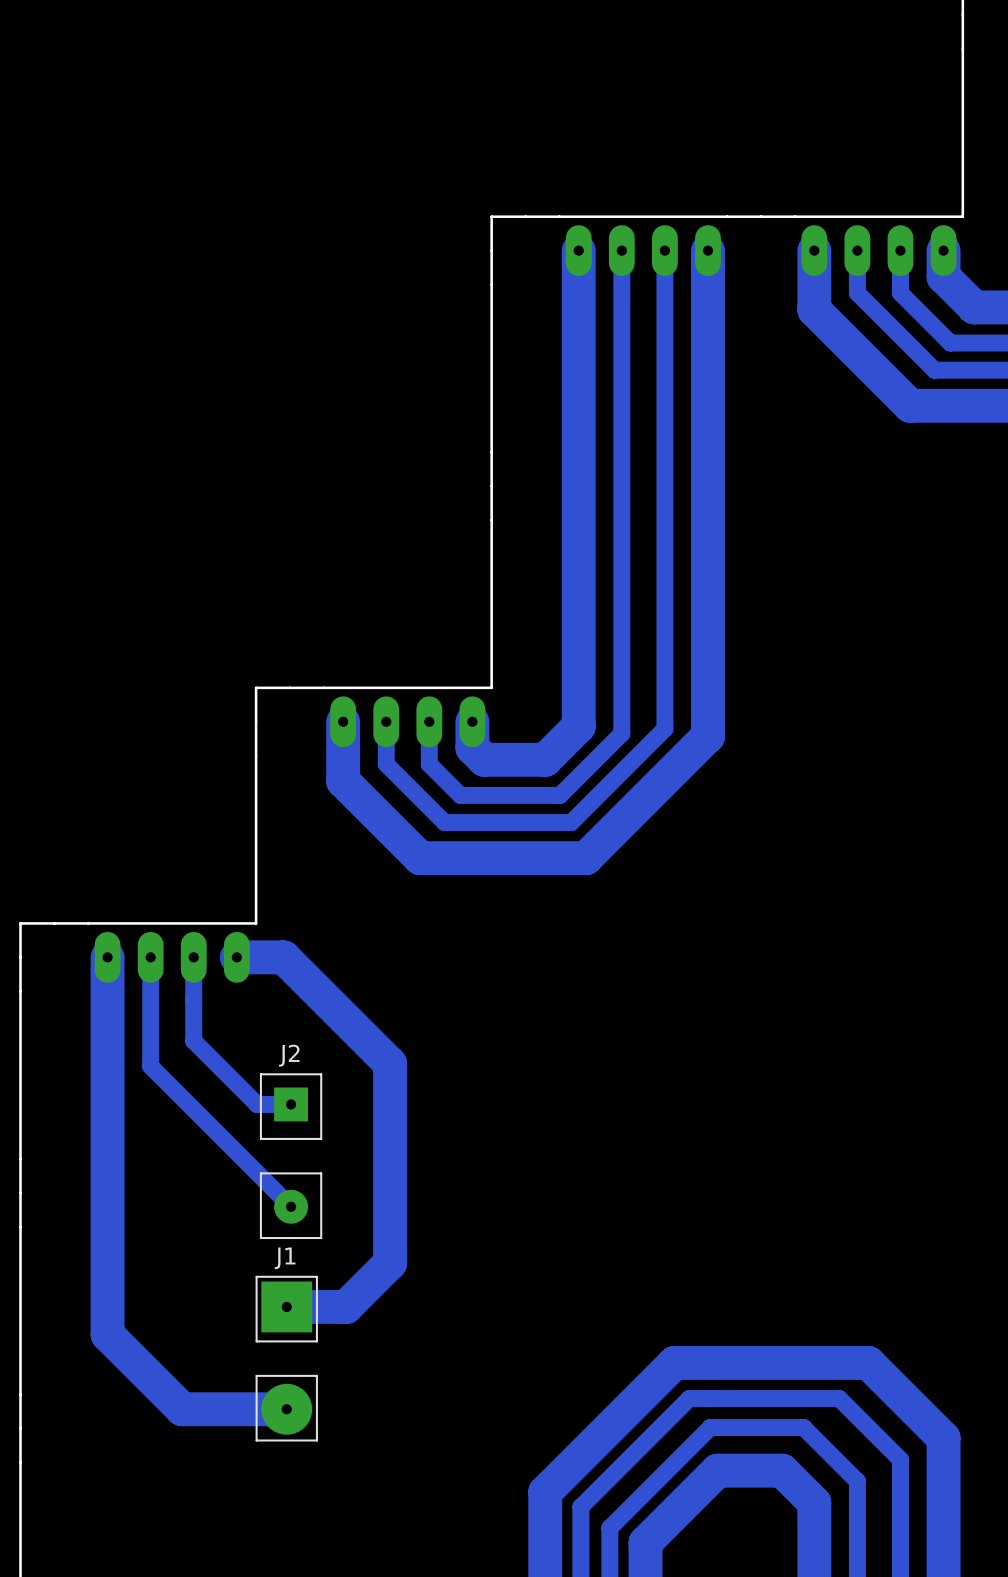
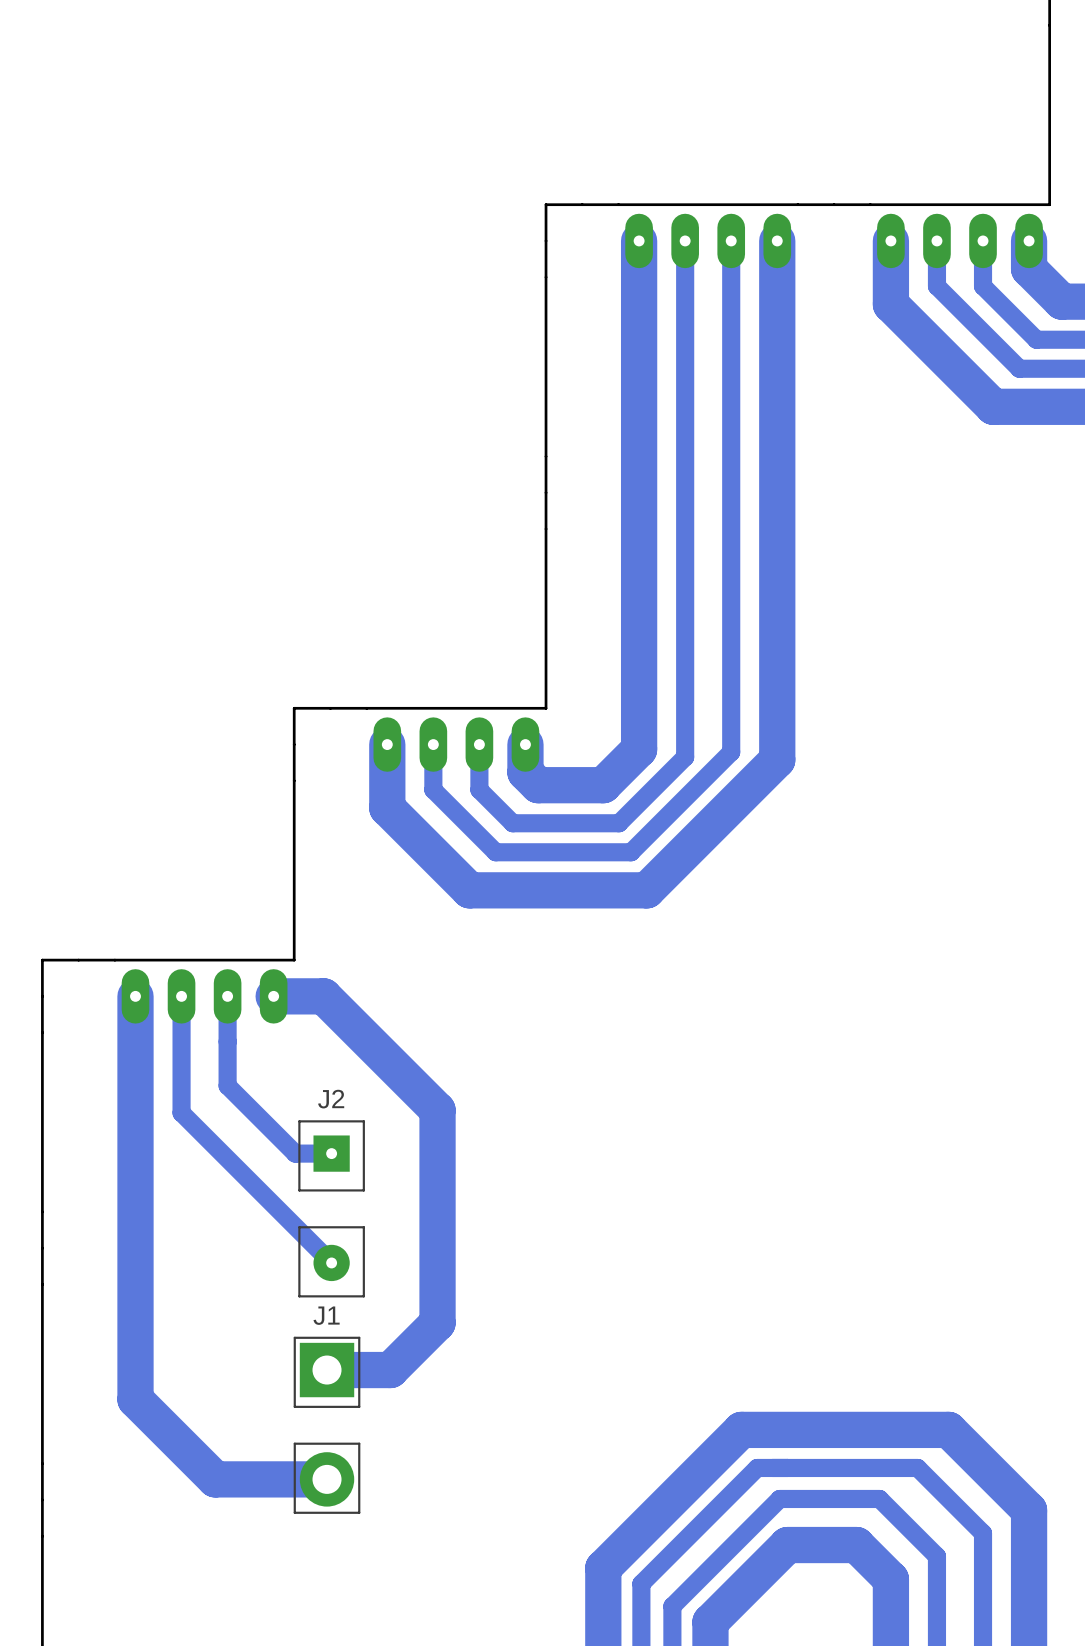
J1 footprint: [255, 1275, 318, 1442] -> [293, 1336, 361, 1514]

